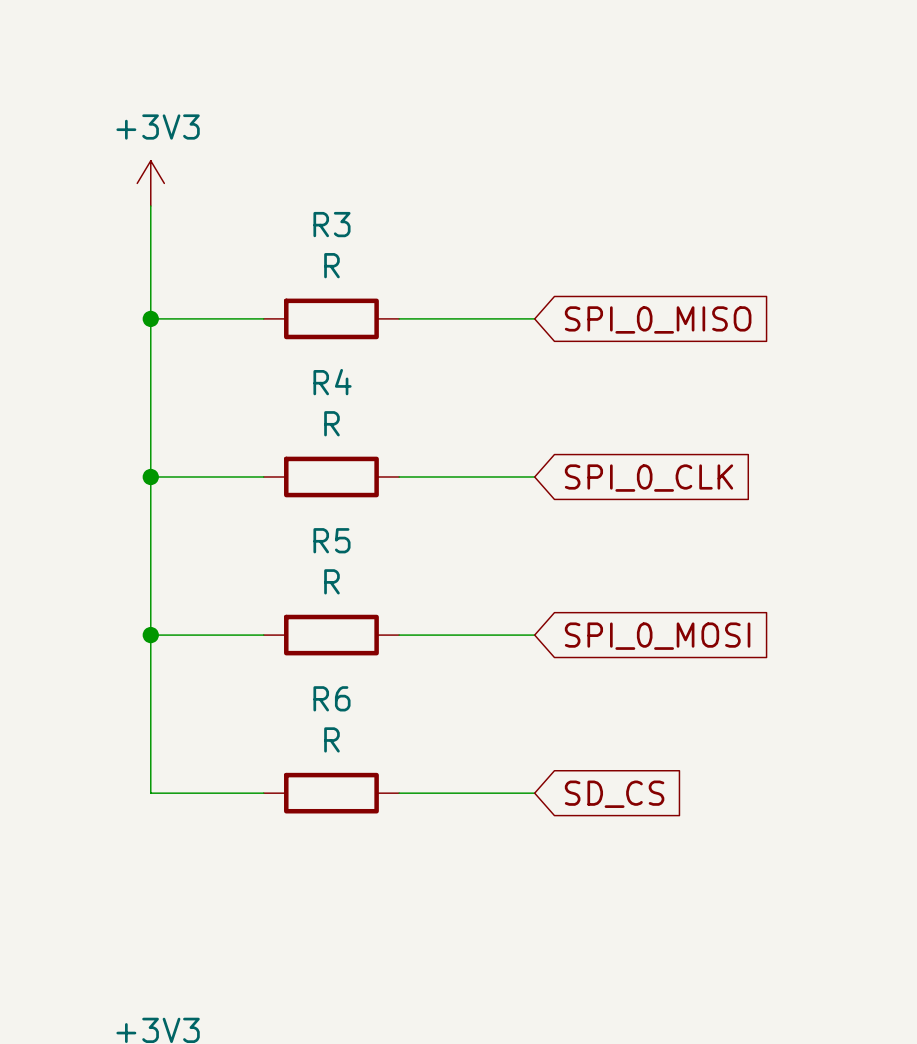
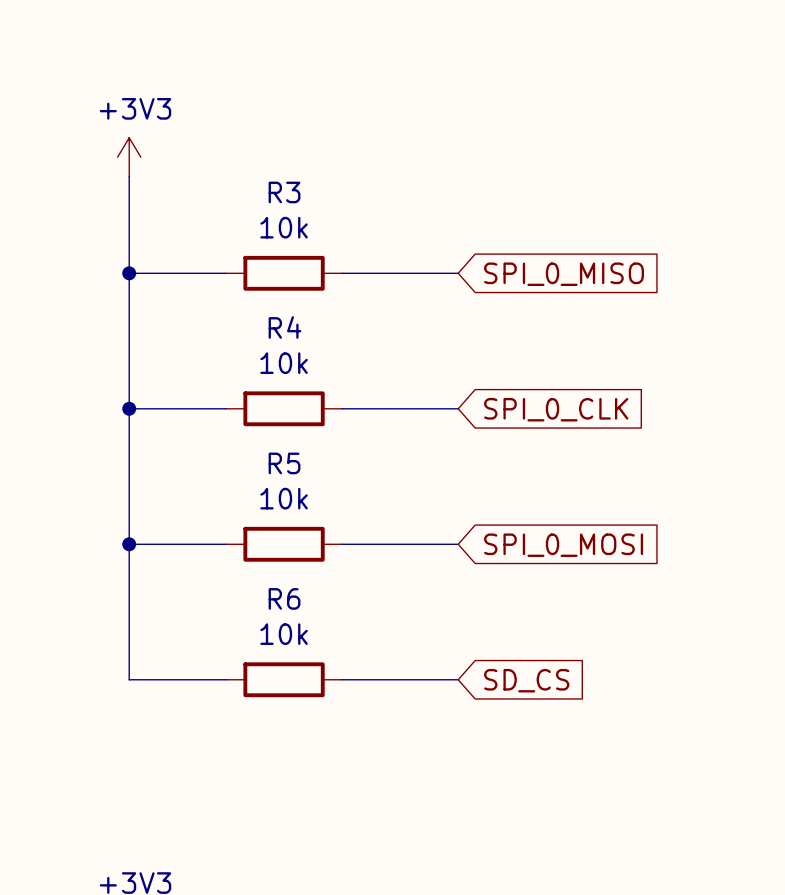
R3 value: R (331, 265) -> 10k (284, 227)
R4 value: R (331, 423) -> 10k (284, 363)
R5 value: R (331, 581) -> 10k (284, 498)
R6 value: R (331, 739) -> 10k (284, 634)

